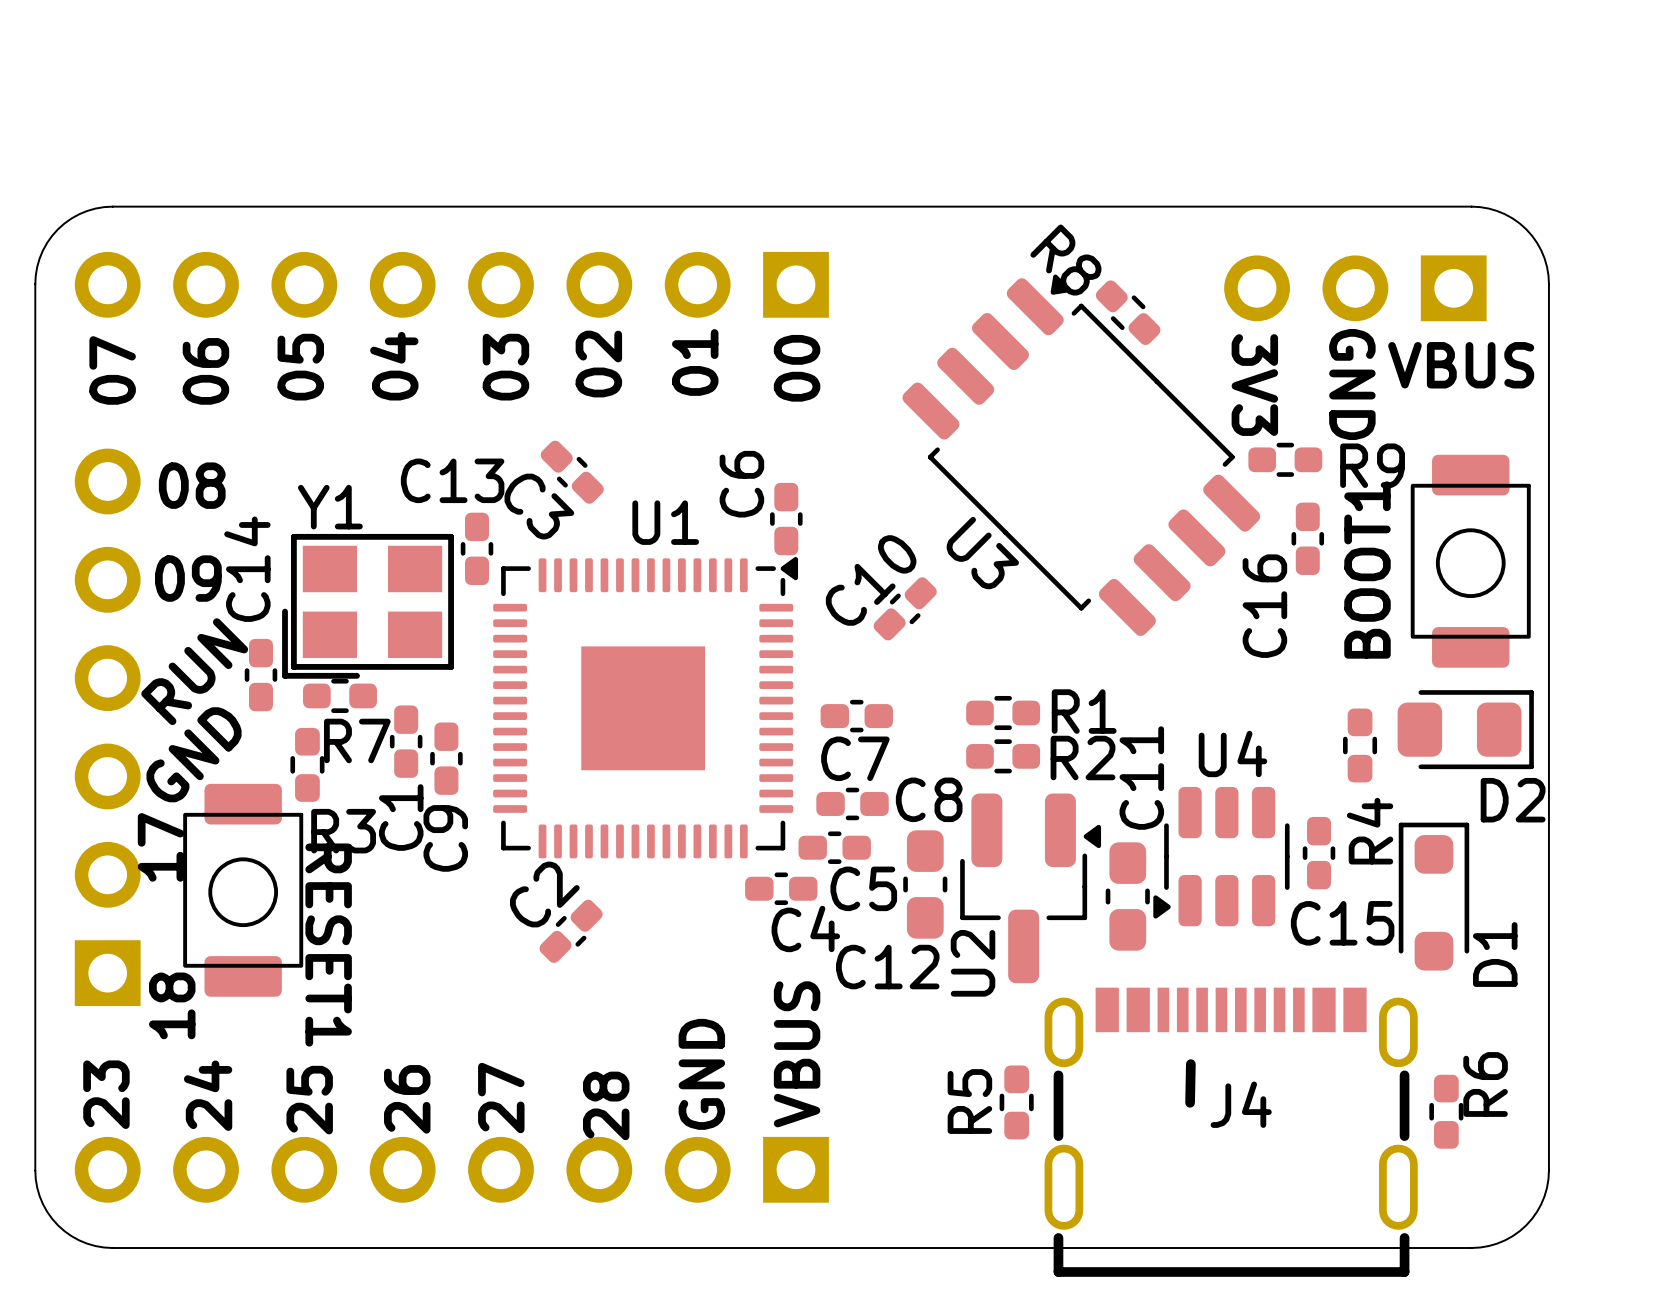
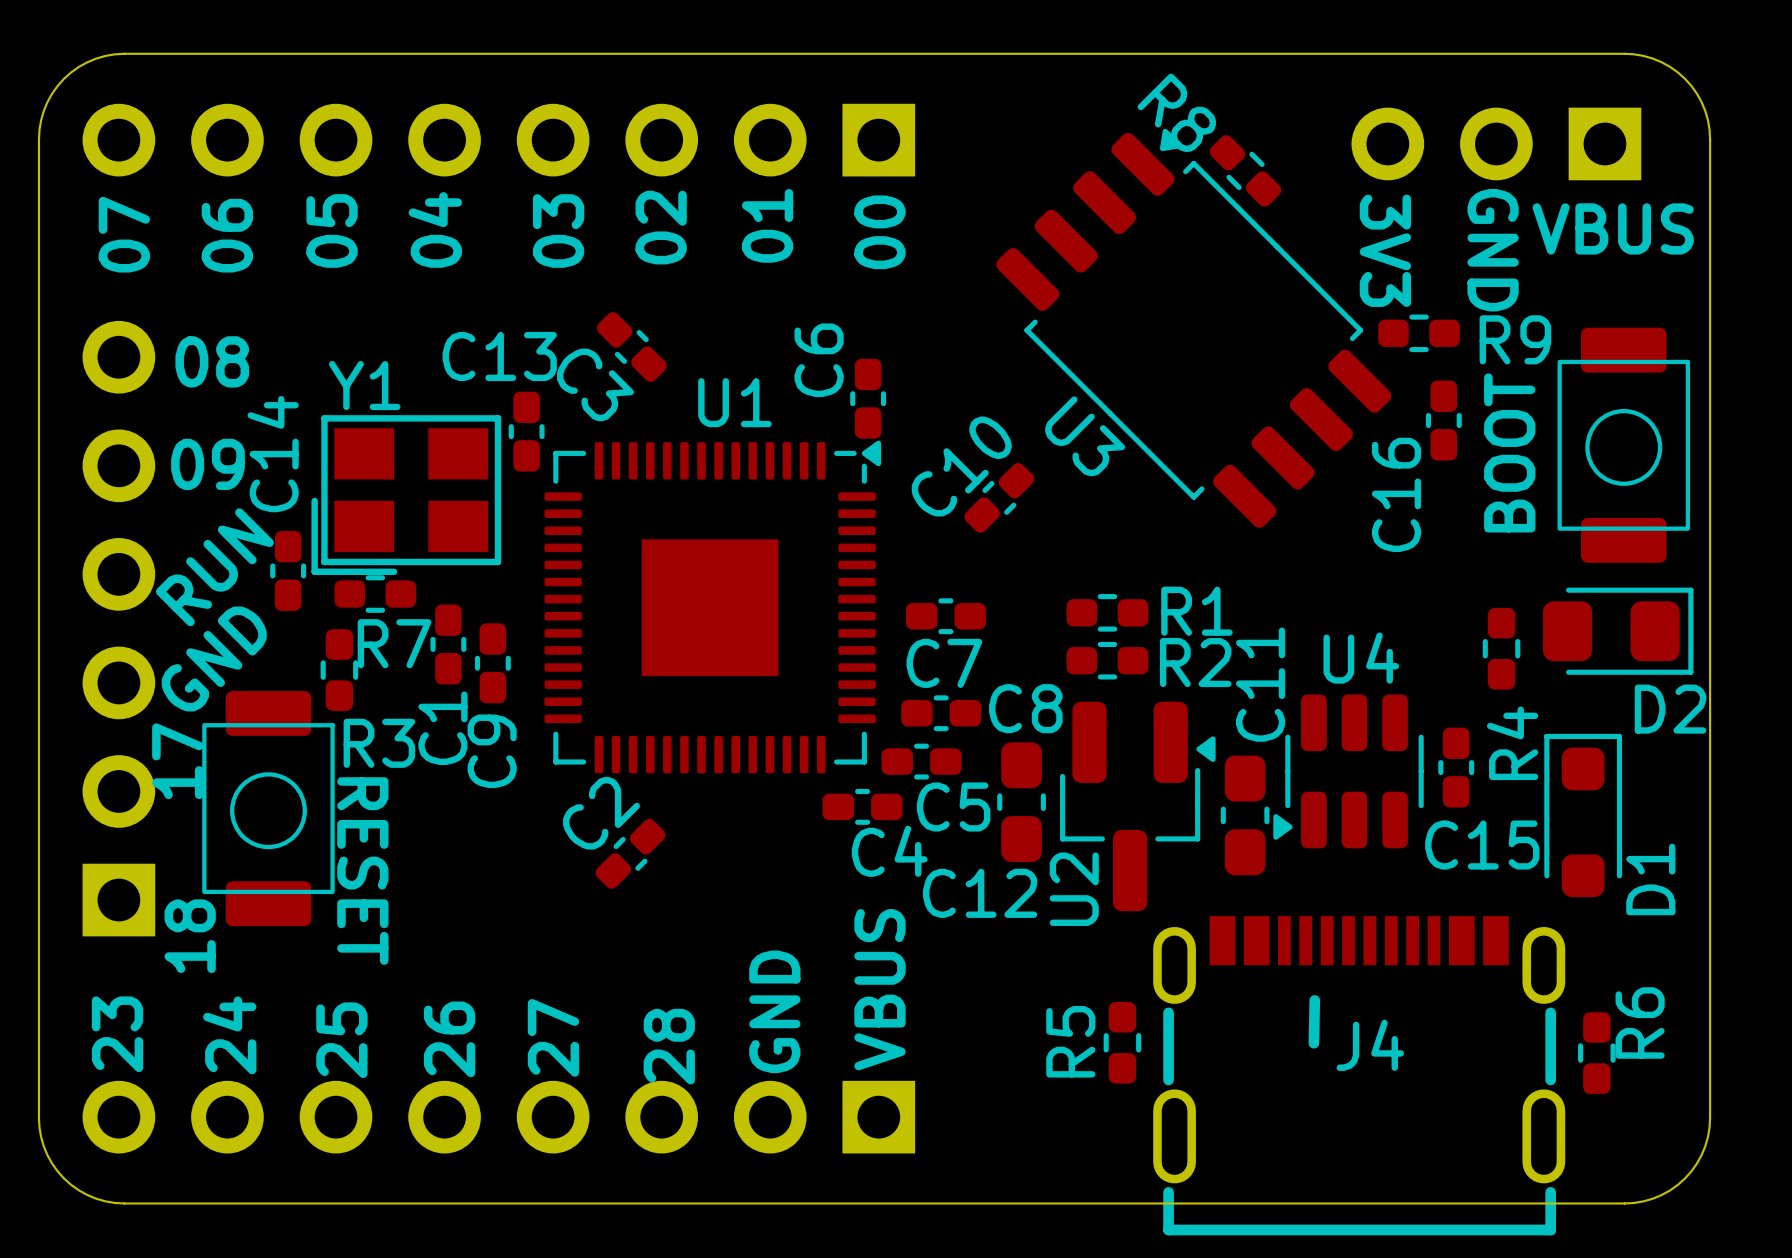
BOOT1 name: BOOT1 (1367, 570) -> BOOT (1509, 452)
RESET1 name: RESET1 (328, 945) -> RESET (362, 871)

